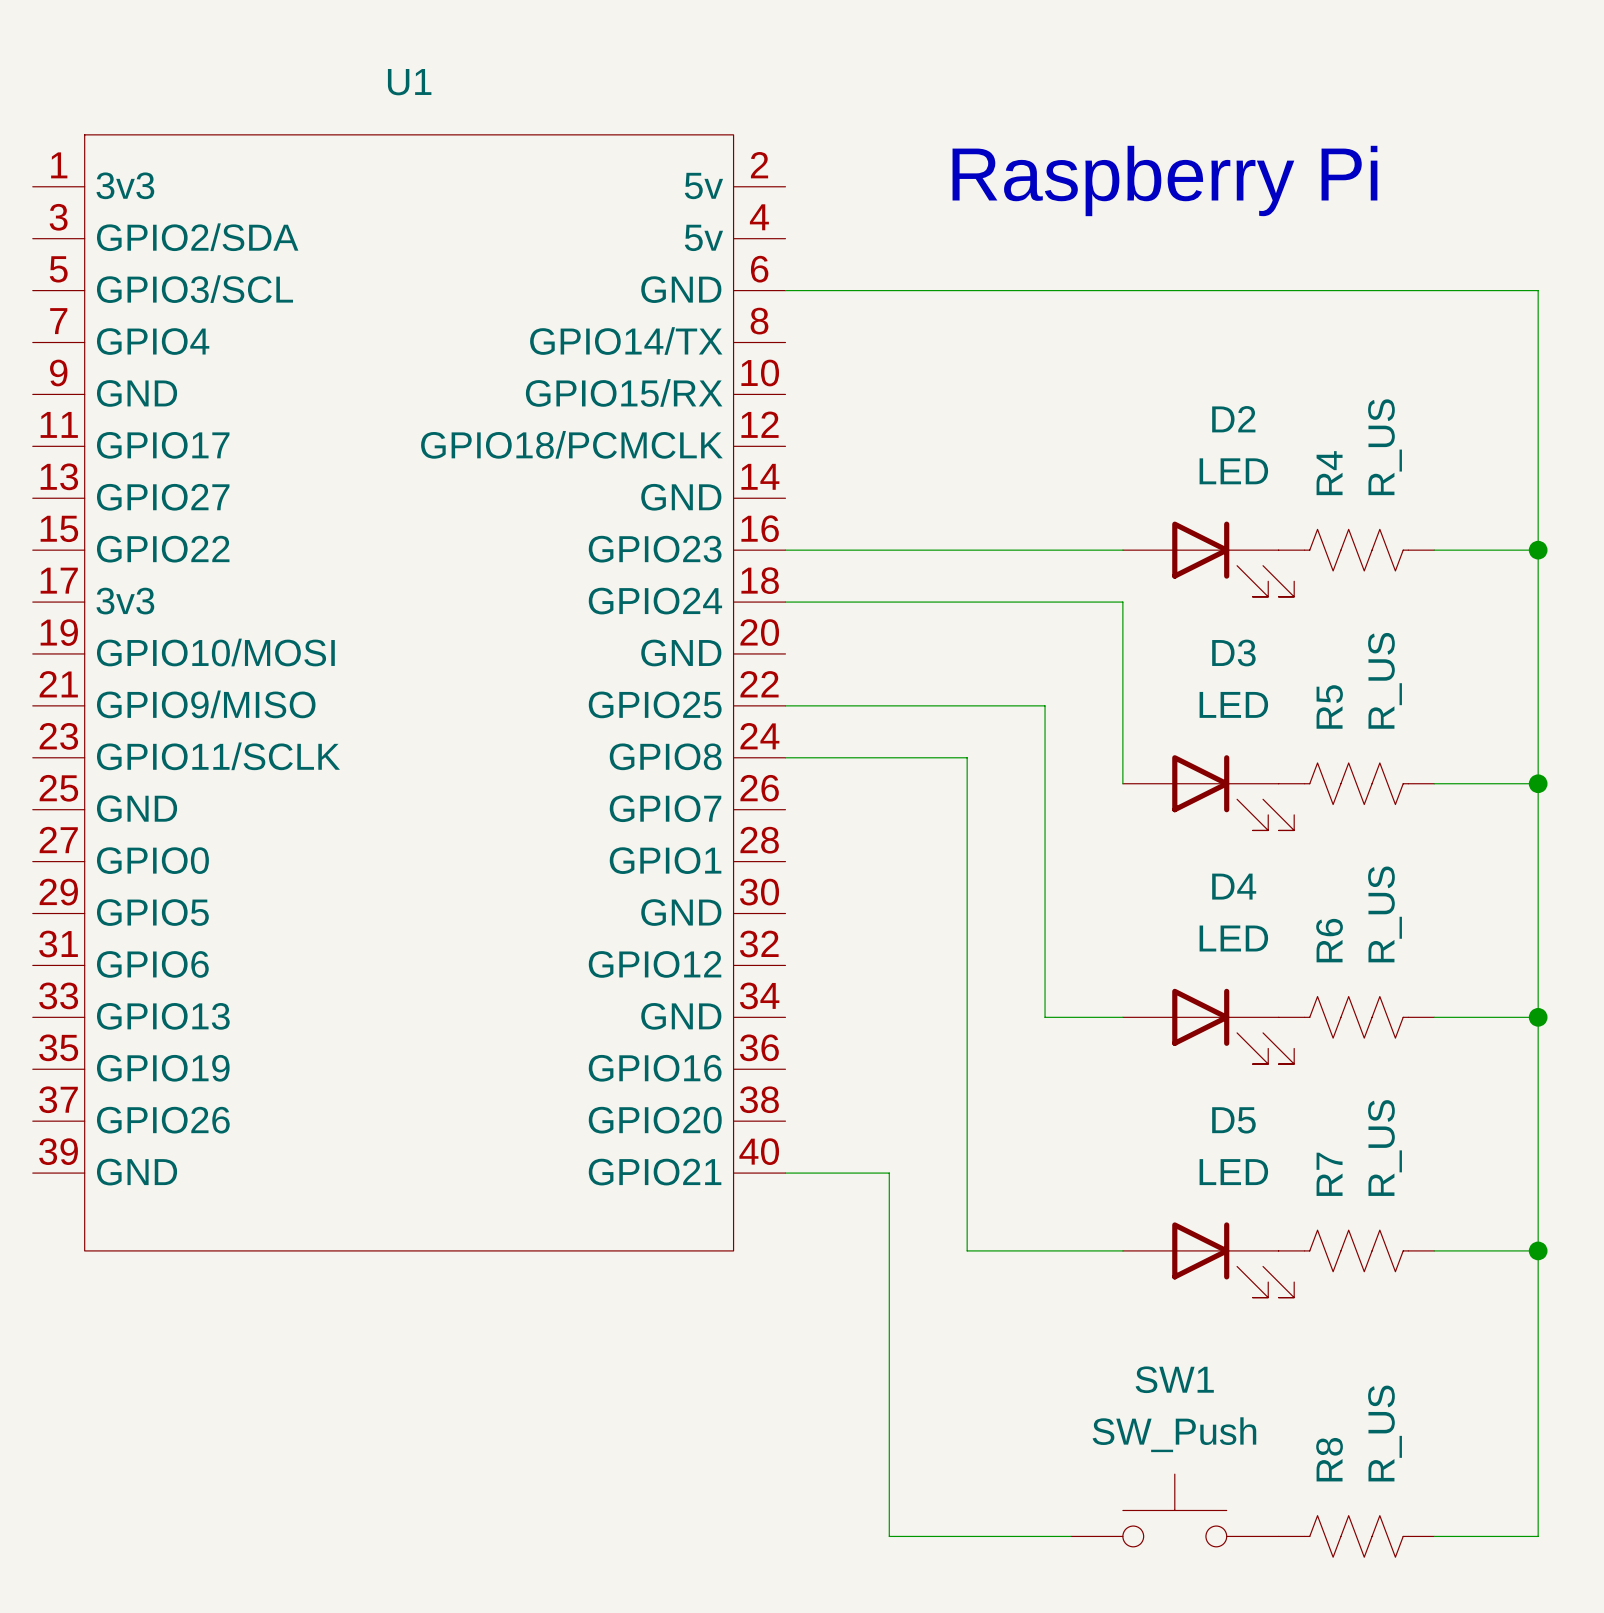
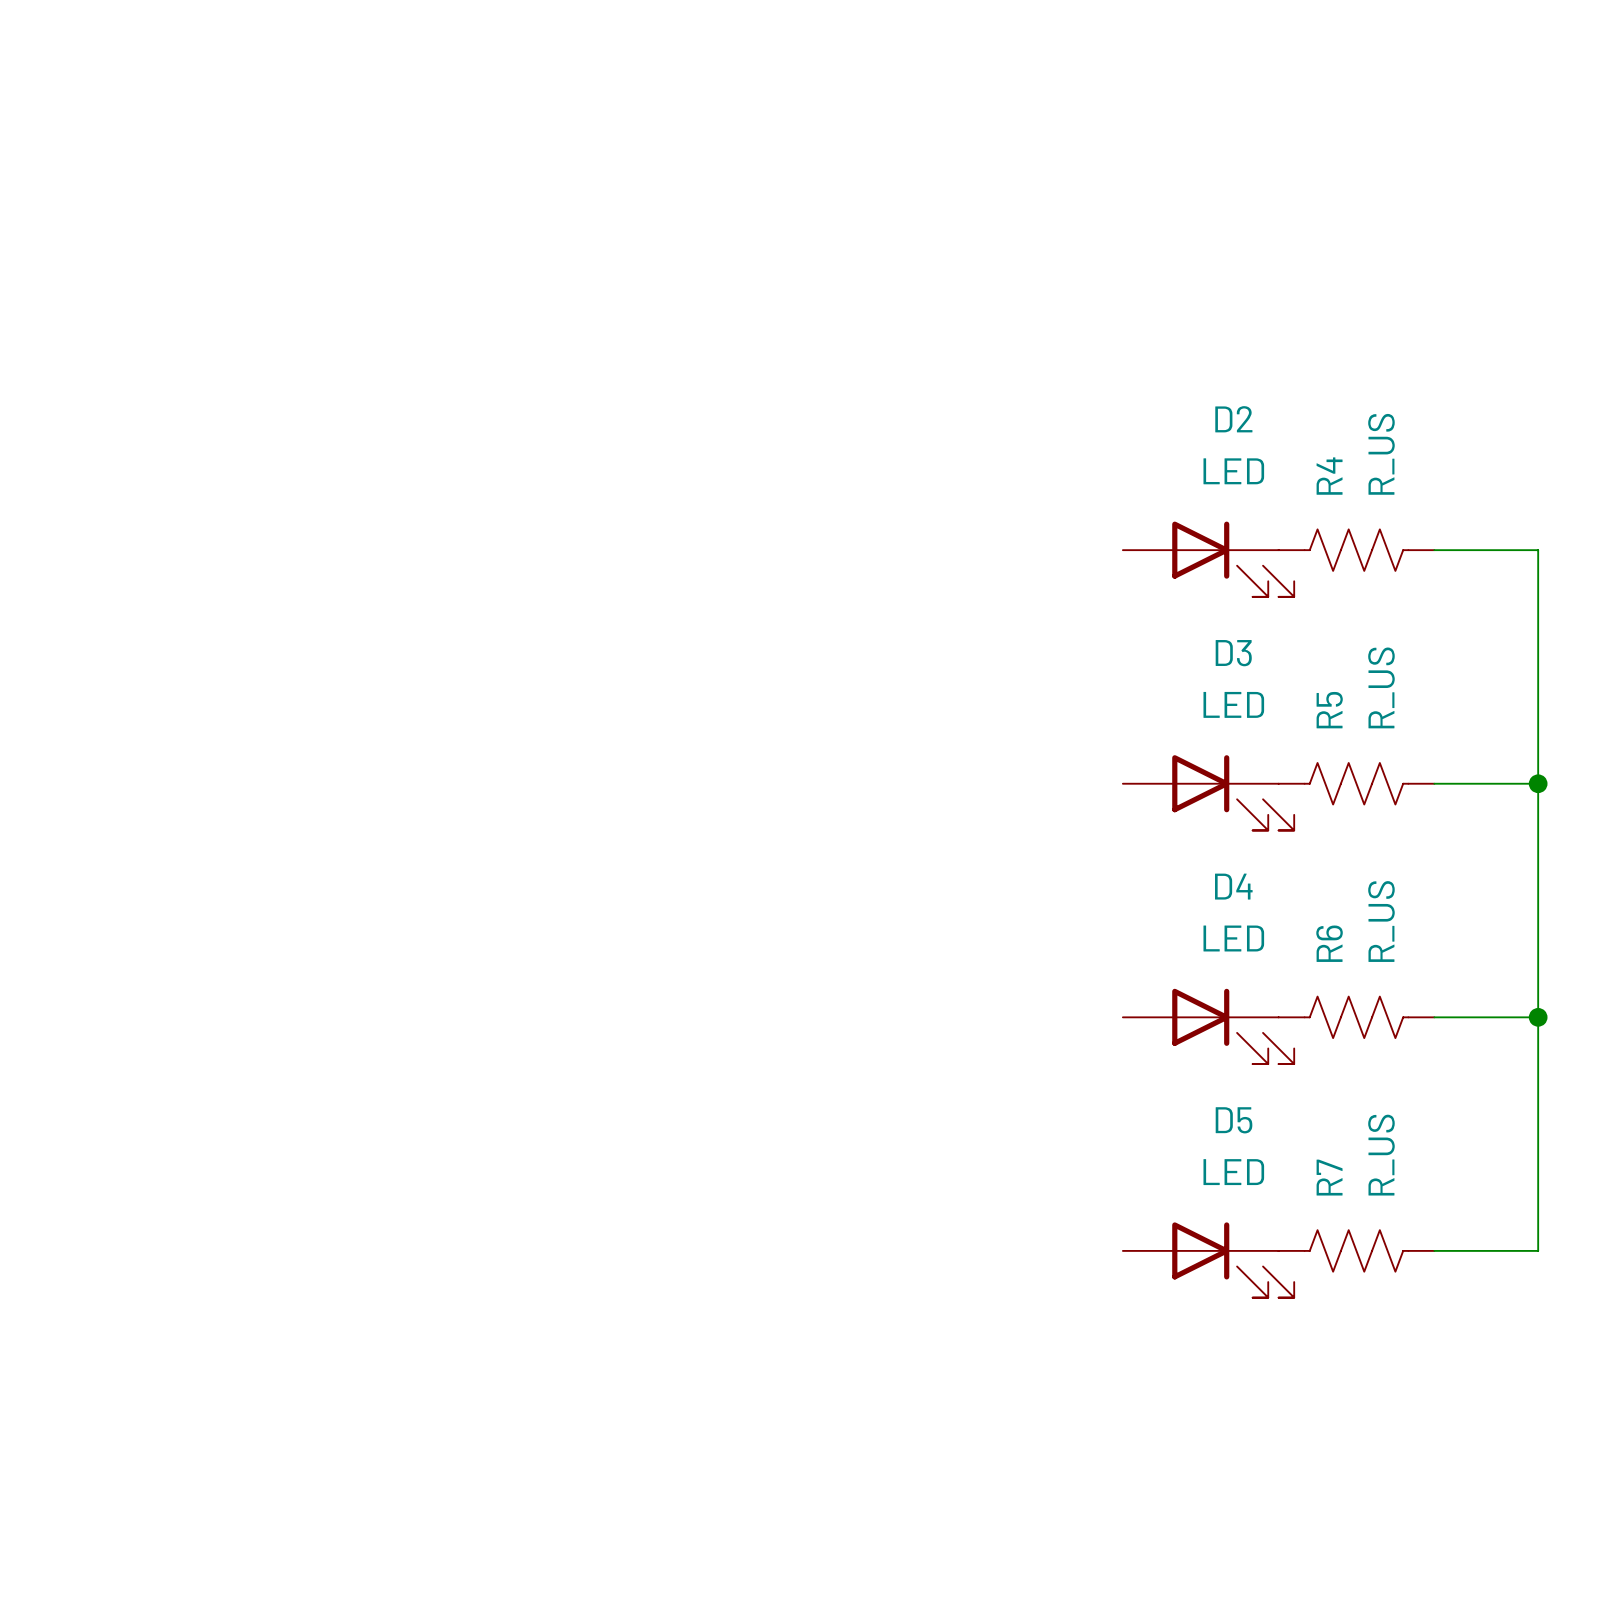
text: Raspberry Pi (1164, 180) -> none
wire: (785, 290) (1538, 290) (1538, 550) -> none
wire: (785, 550) (1122, 550) -> none
junction: (1538, 550) -> none
wire: (785, 602) (1122, 602) (1122, 783) -> none
U1: (409, 692) -> none
wire: (785, 705) (1045, 705) (1045, 1017) (1122, 1017) -> none
wire: (785, 757) (967, 757) (967, 1250) (1122, 1250) -> none
wire: (785, 1173) (889, 1173) (889, 1536) (1070, 1536) -> none
wire: (1538, 1250) (1538, 1536) (1434, 1536) -> none
junction: (1538, 1250) -> none
SW1: SW_Push (1174, 1510) -> none
R8: R_US (1356, 1536) -> none

